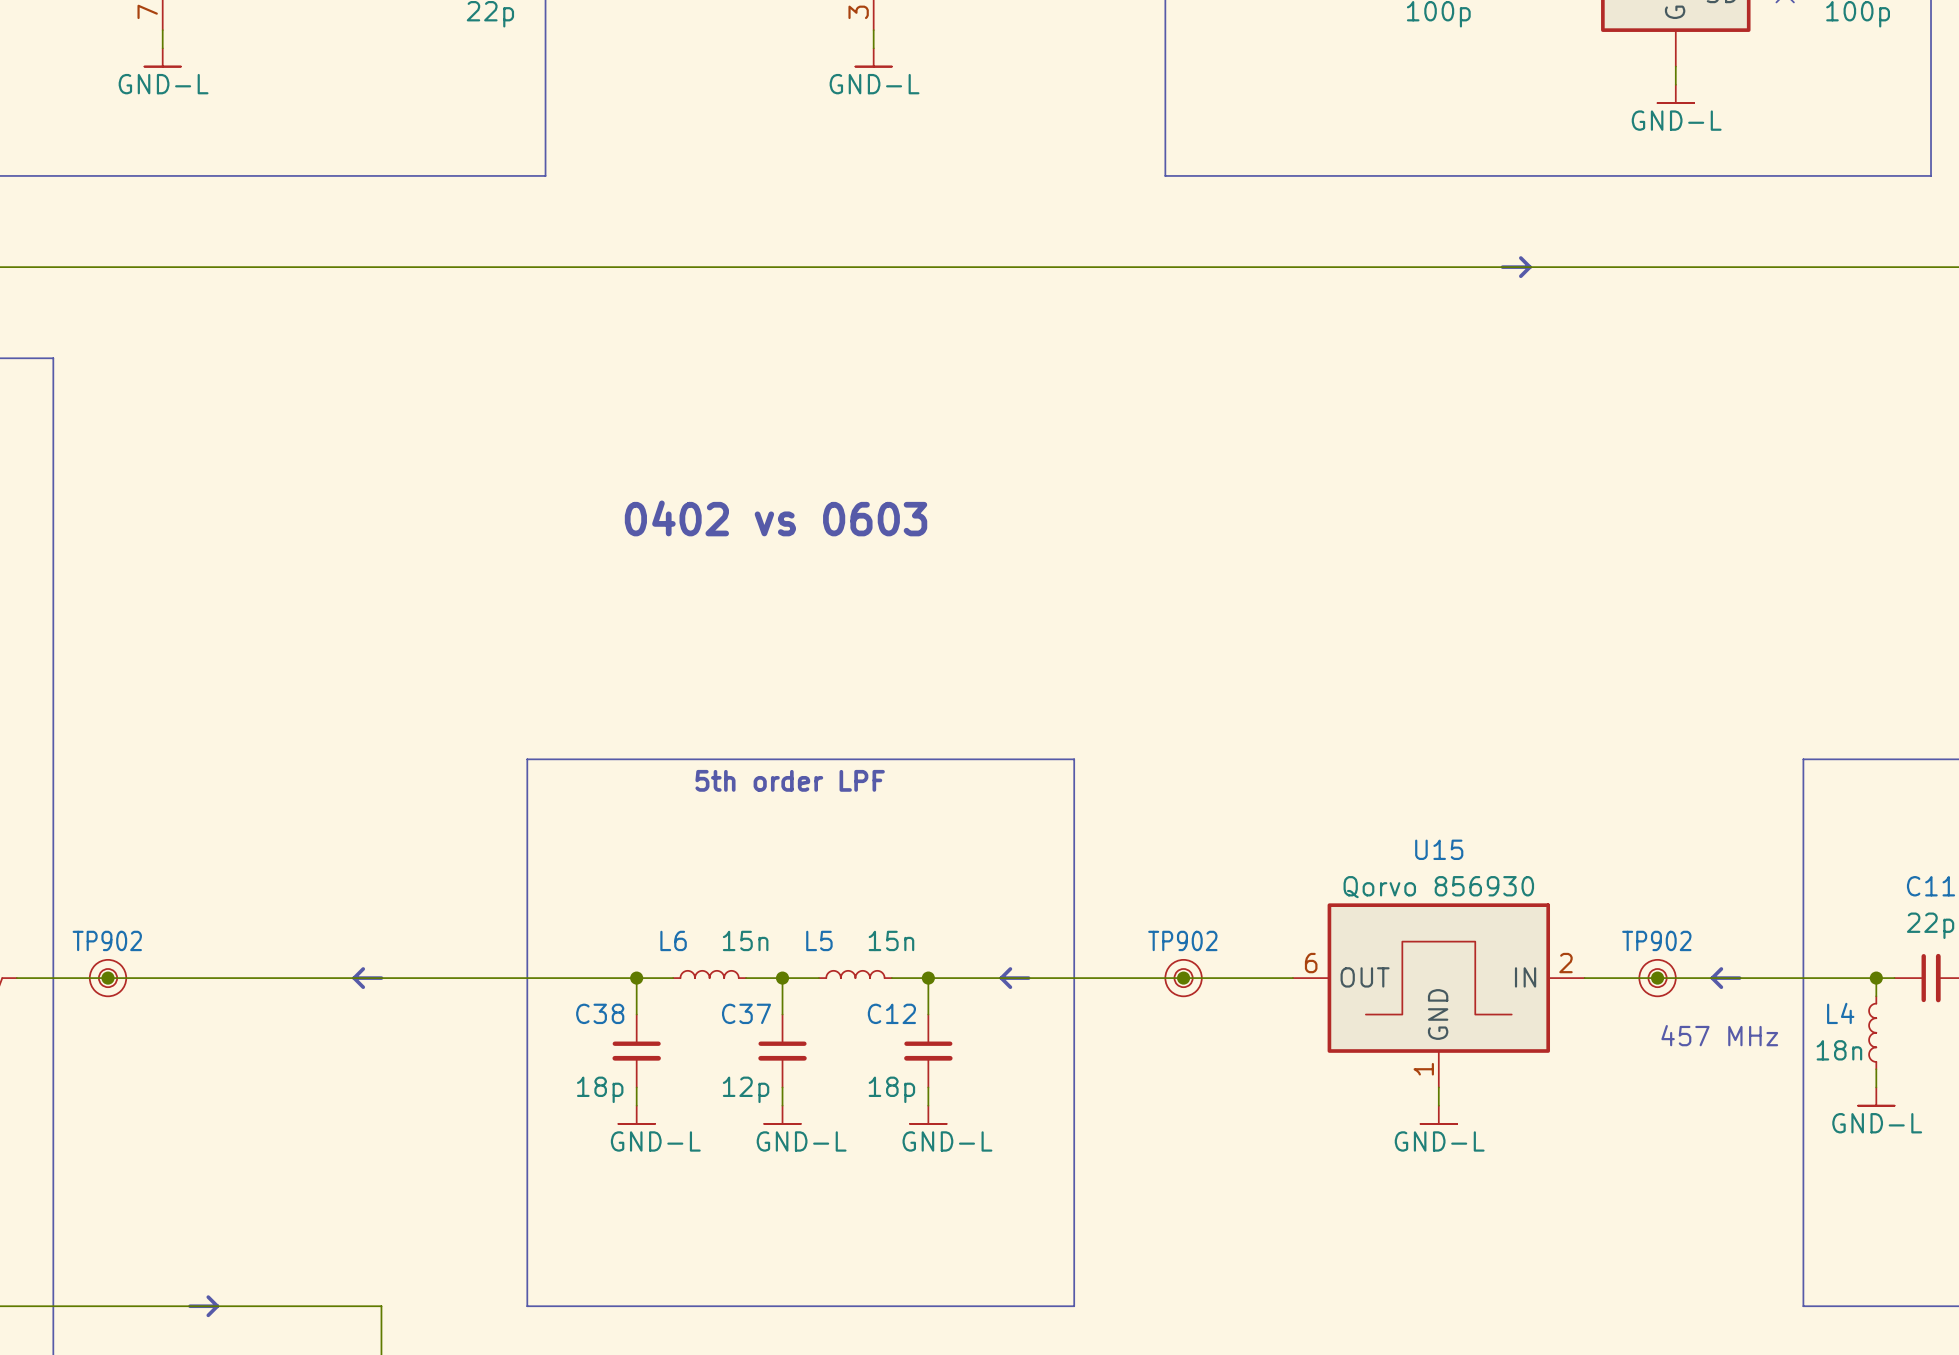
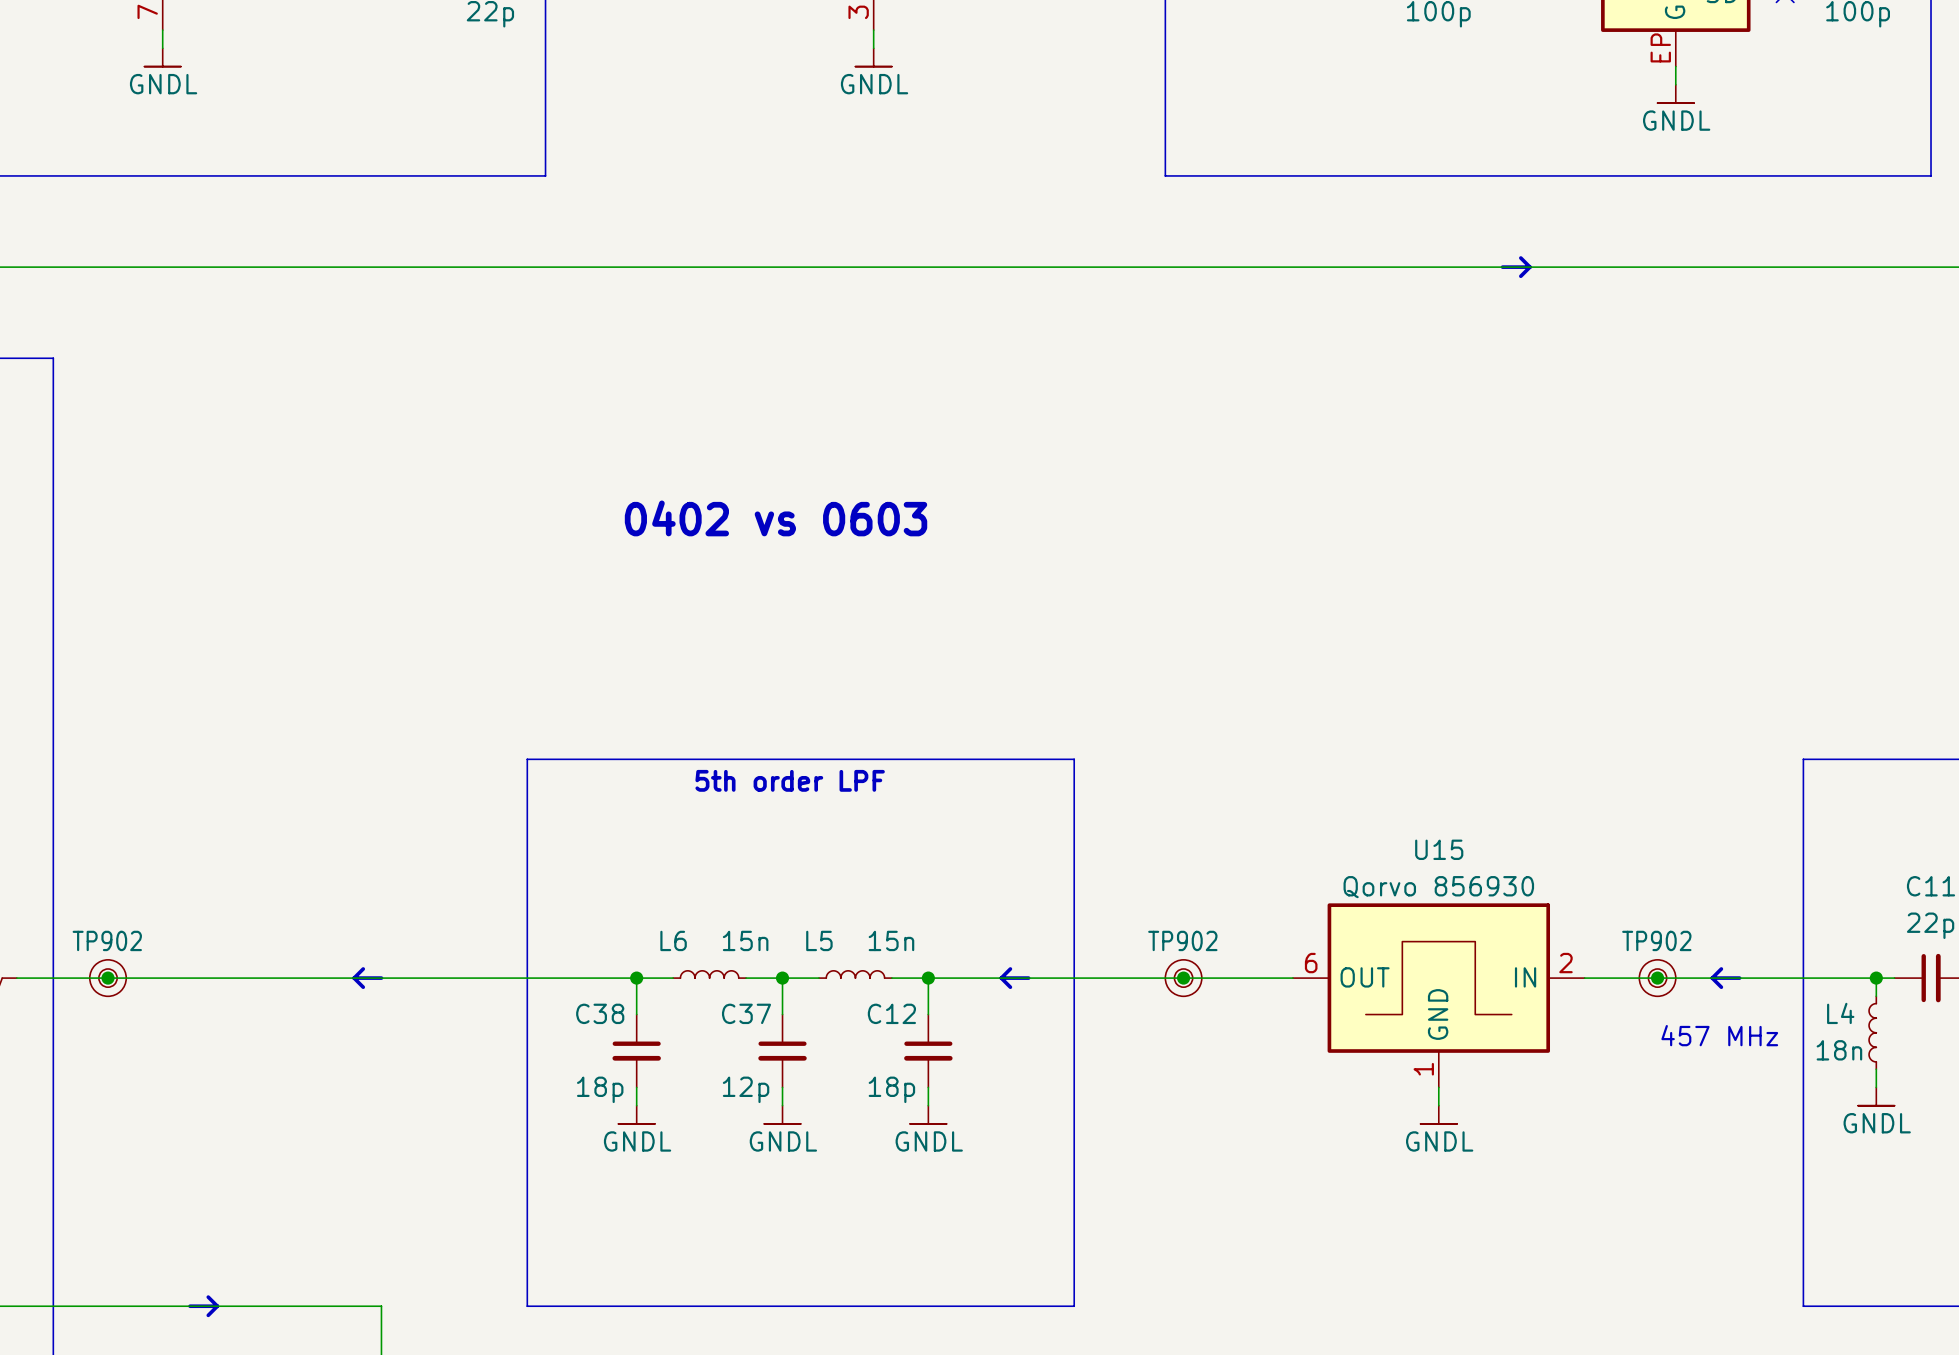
part pin number: none -> EP (1660, 47)
power symbol: GND-L (162, 57) -> GNDL (162, 57)
power symbol: GND-L (873, 57) -> GNDL (873, 57)
power symbol: GND-L (1675, 93) -> GNDL (1675, 93)
power symbol: GND-L (1876, 1096) -> GNDL (1876, 1096)
power symbol: GND-L (636, 1114) -> GNDL (636, 1114)
power symbol: GND-L (782, 1114) -> GNDL (782, 1114)
power symbol: GND-L (928, 1114) -> GNDL (928, 1114)
power symbol: GND-L (1438, 1114) -> GNDL (1438, 1114)

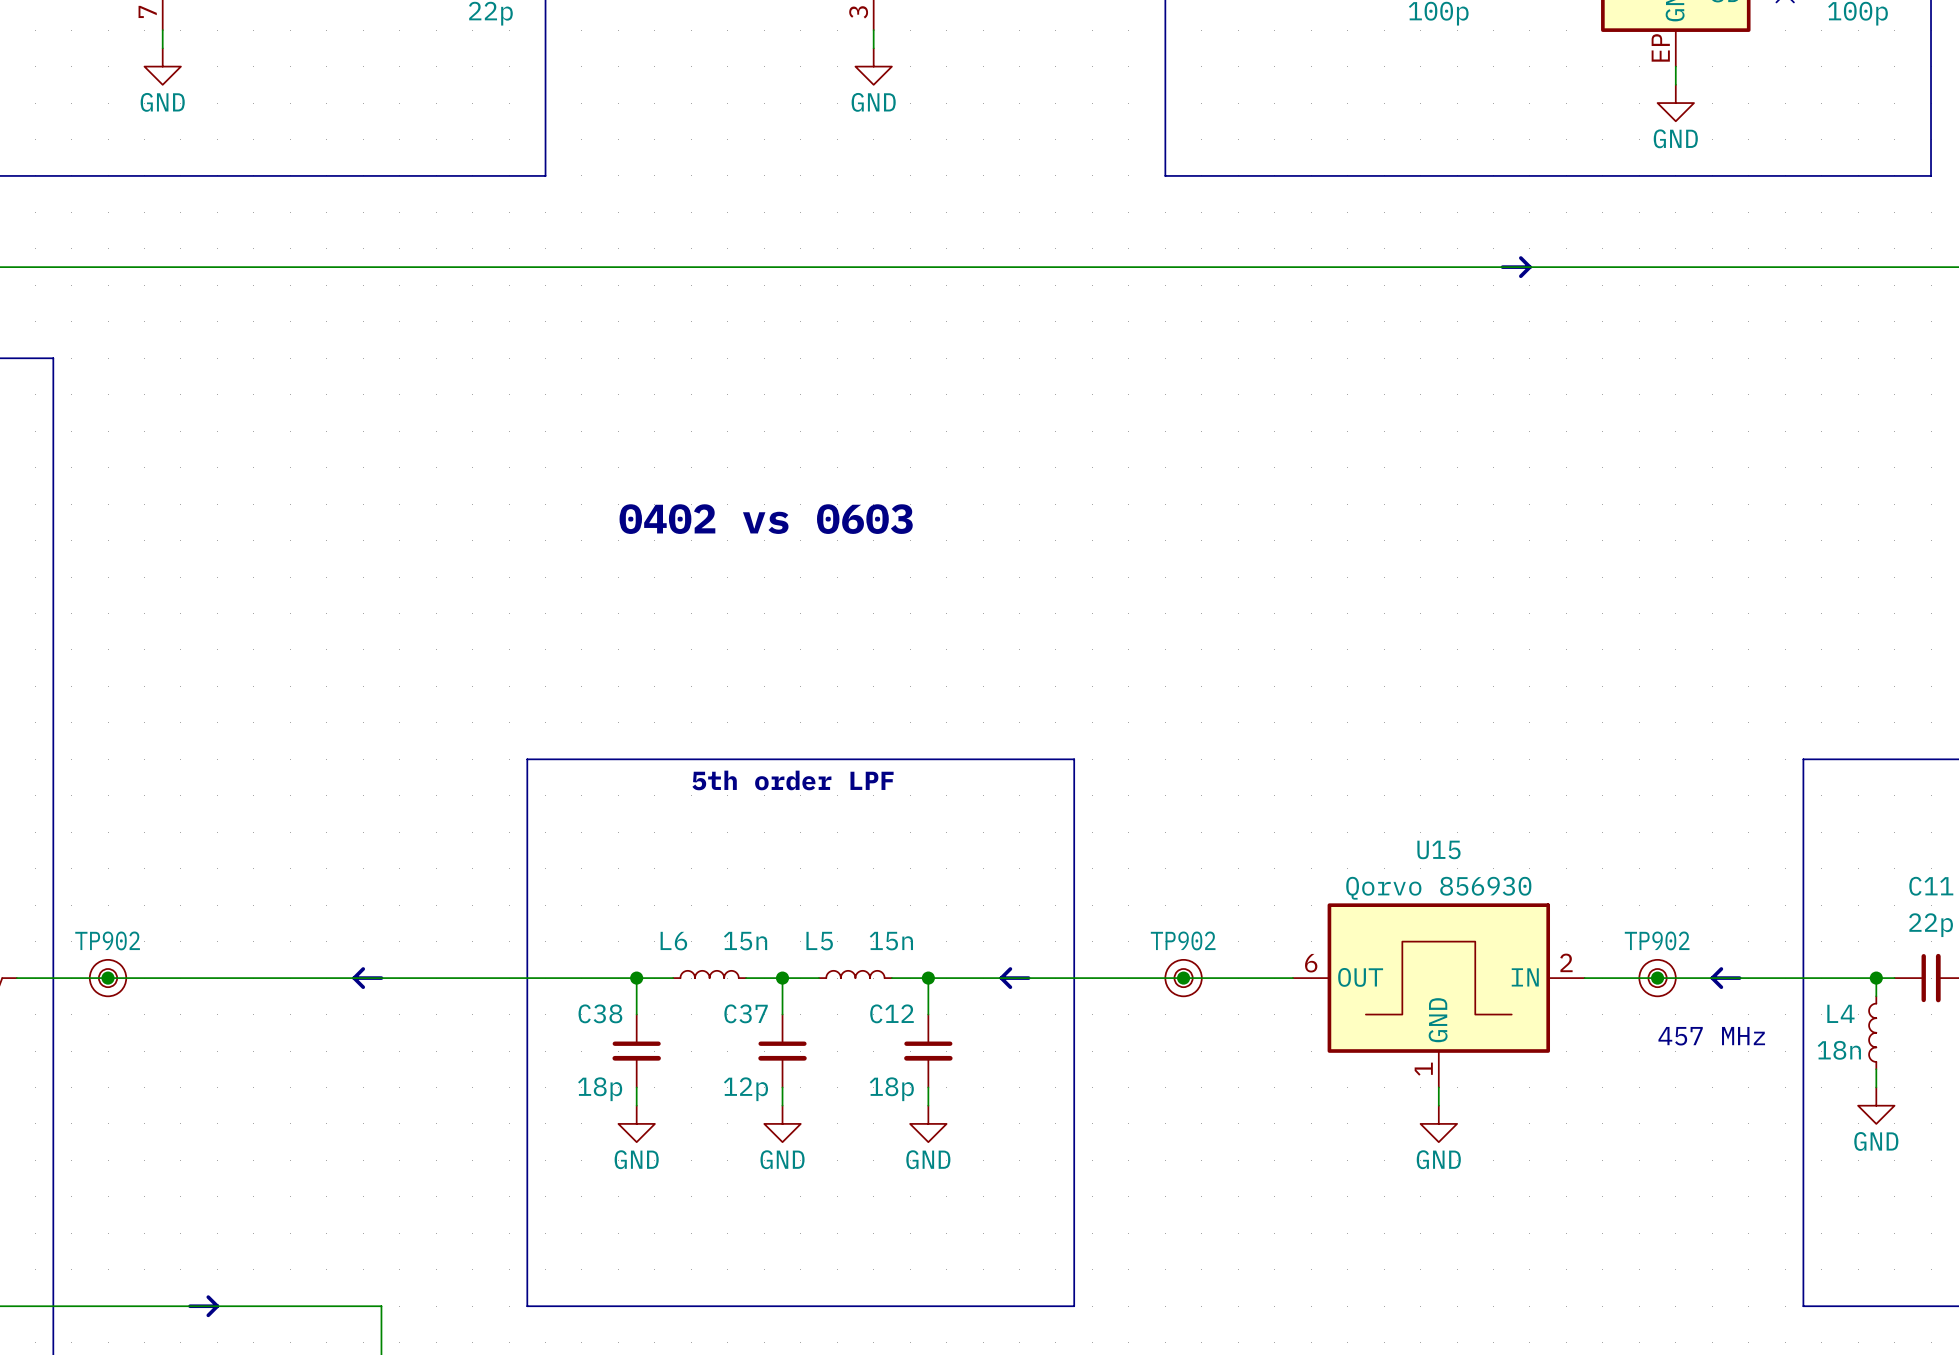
power symbol: GNDL (162, 57) -> GND (162, 66)
power symbol: GNDL (873, 57) -> GND (873, 66)
power symbol: GNDL (1675, 93) -> GND (1675, 103)
power symbol: GNDL (1876, 1096) -> GND (1876, 1105)
power symbol: GNDL (636, 1114) -> GND (636, 1123)
power symbol: GNDL (782, 1114) -> GND (782, 1123)
power symbol: GNDL (928, 1114) -> GND (928, 1123)
power symbol: GNDL (1438, 1114) -> GND (1438, 1123)

